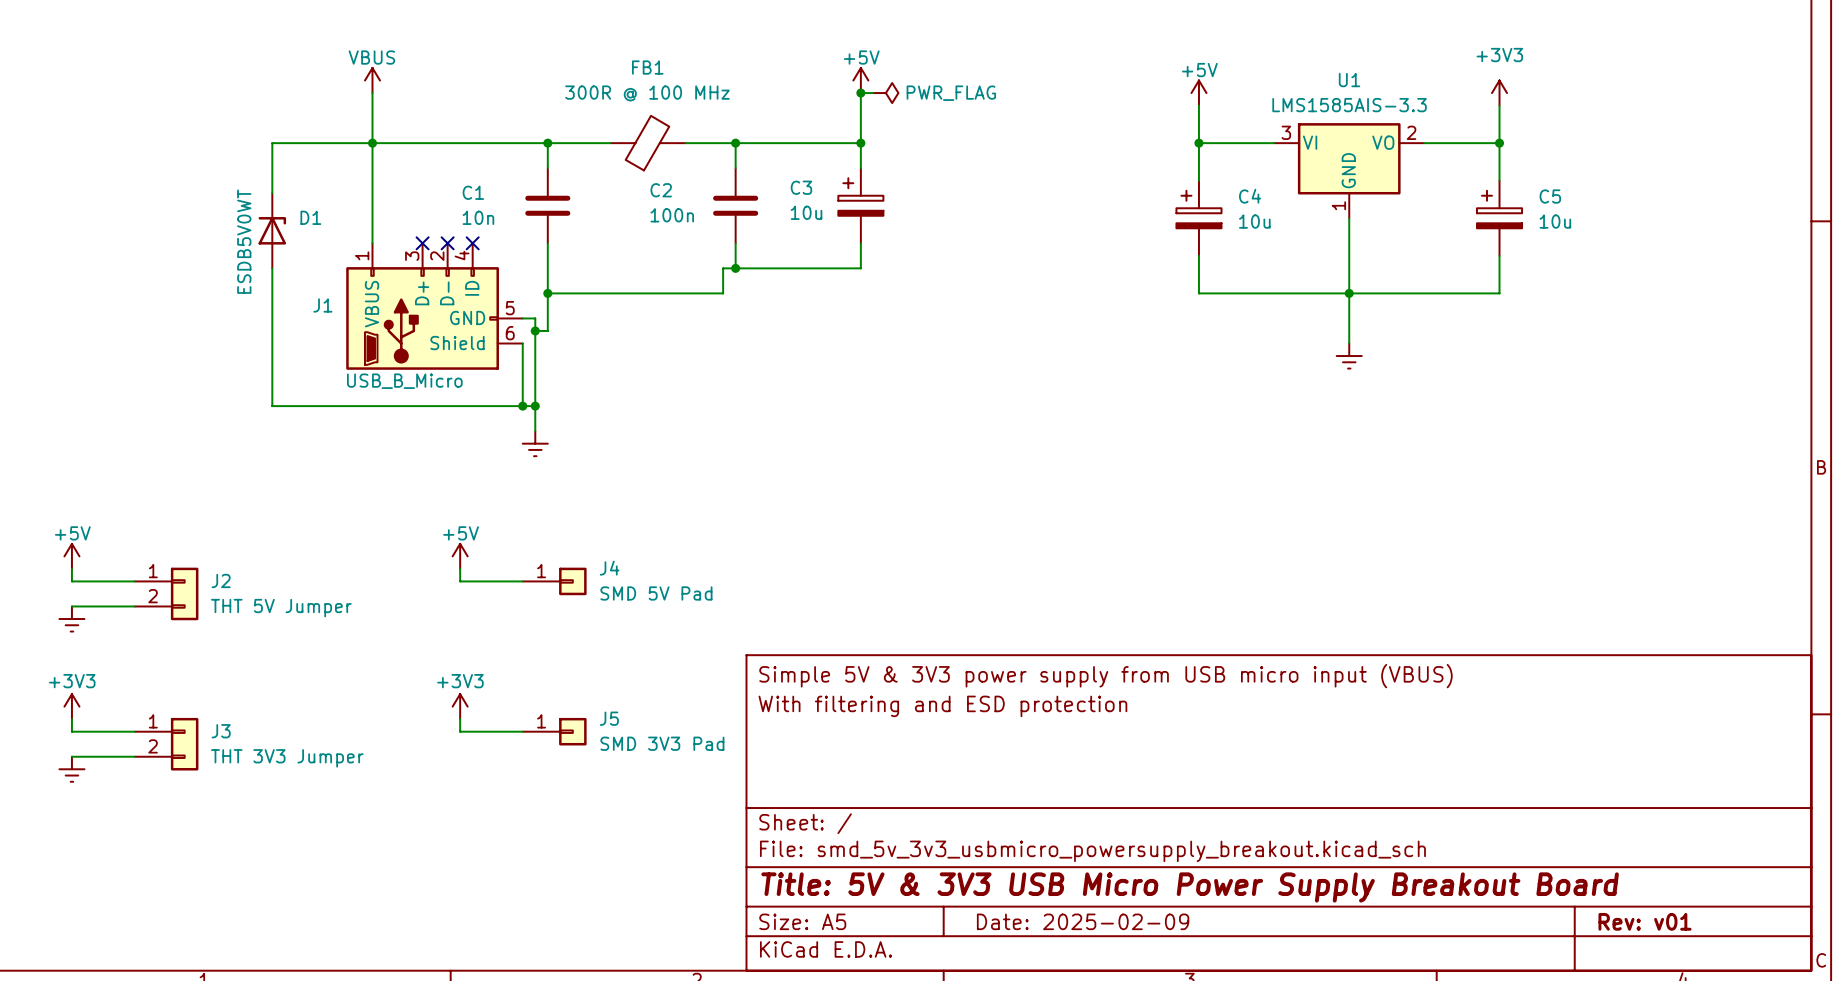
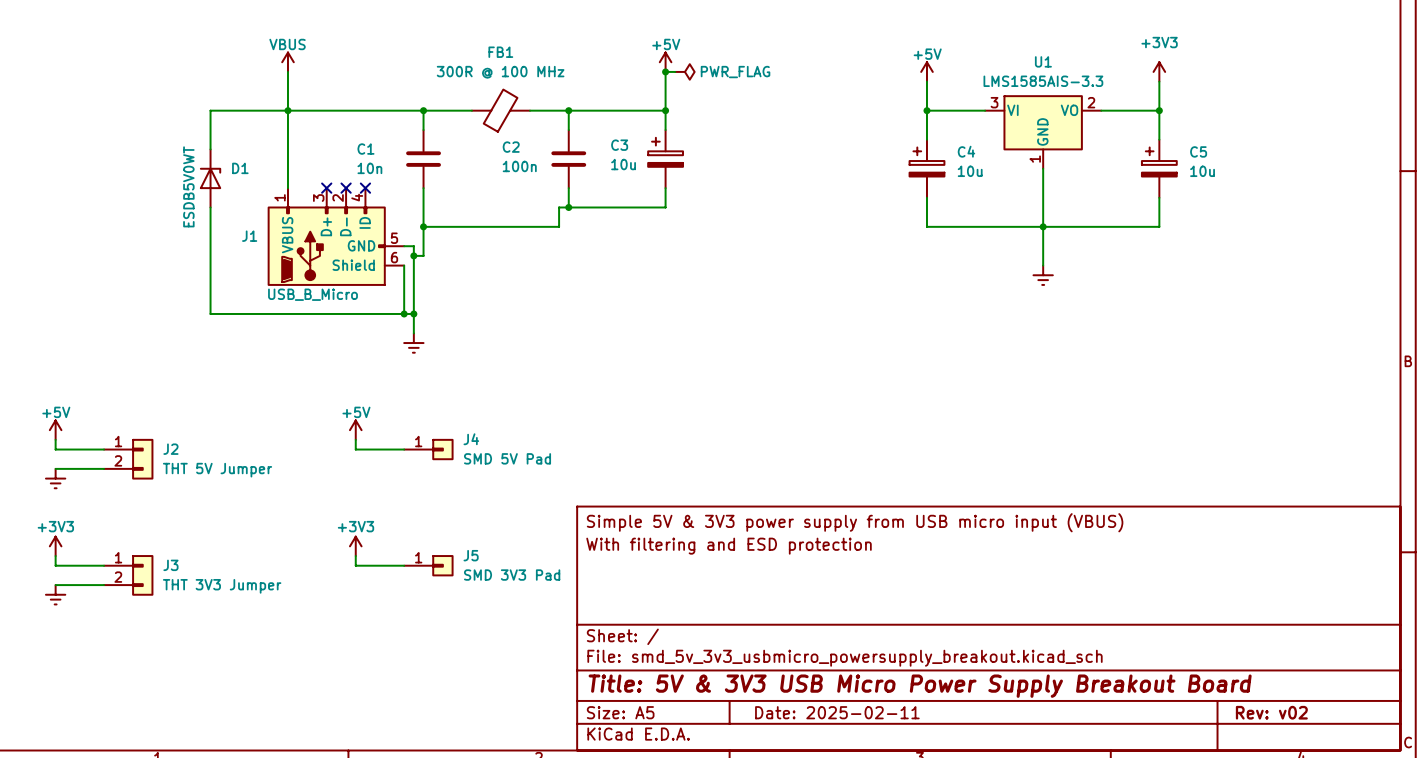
title block: Date: 2025-02-09 (1083, 921) -> Date: 2025-02-11 (837, 712)
title block: Rev: v01 (1645, 921) -> Rev: v02 (1271, 712)

